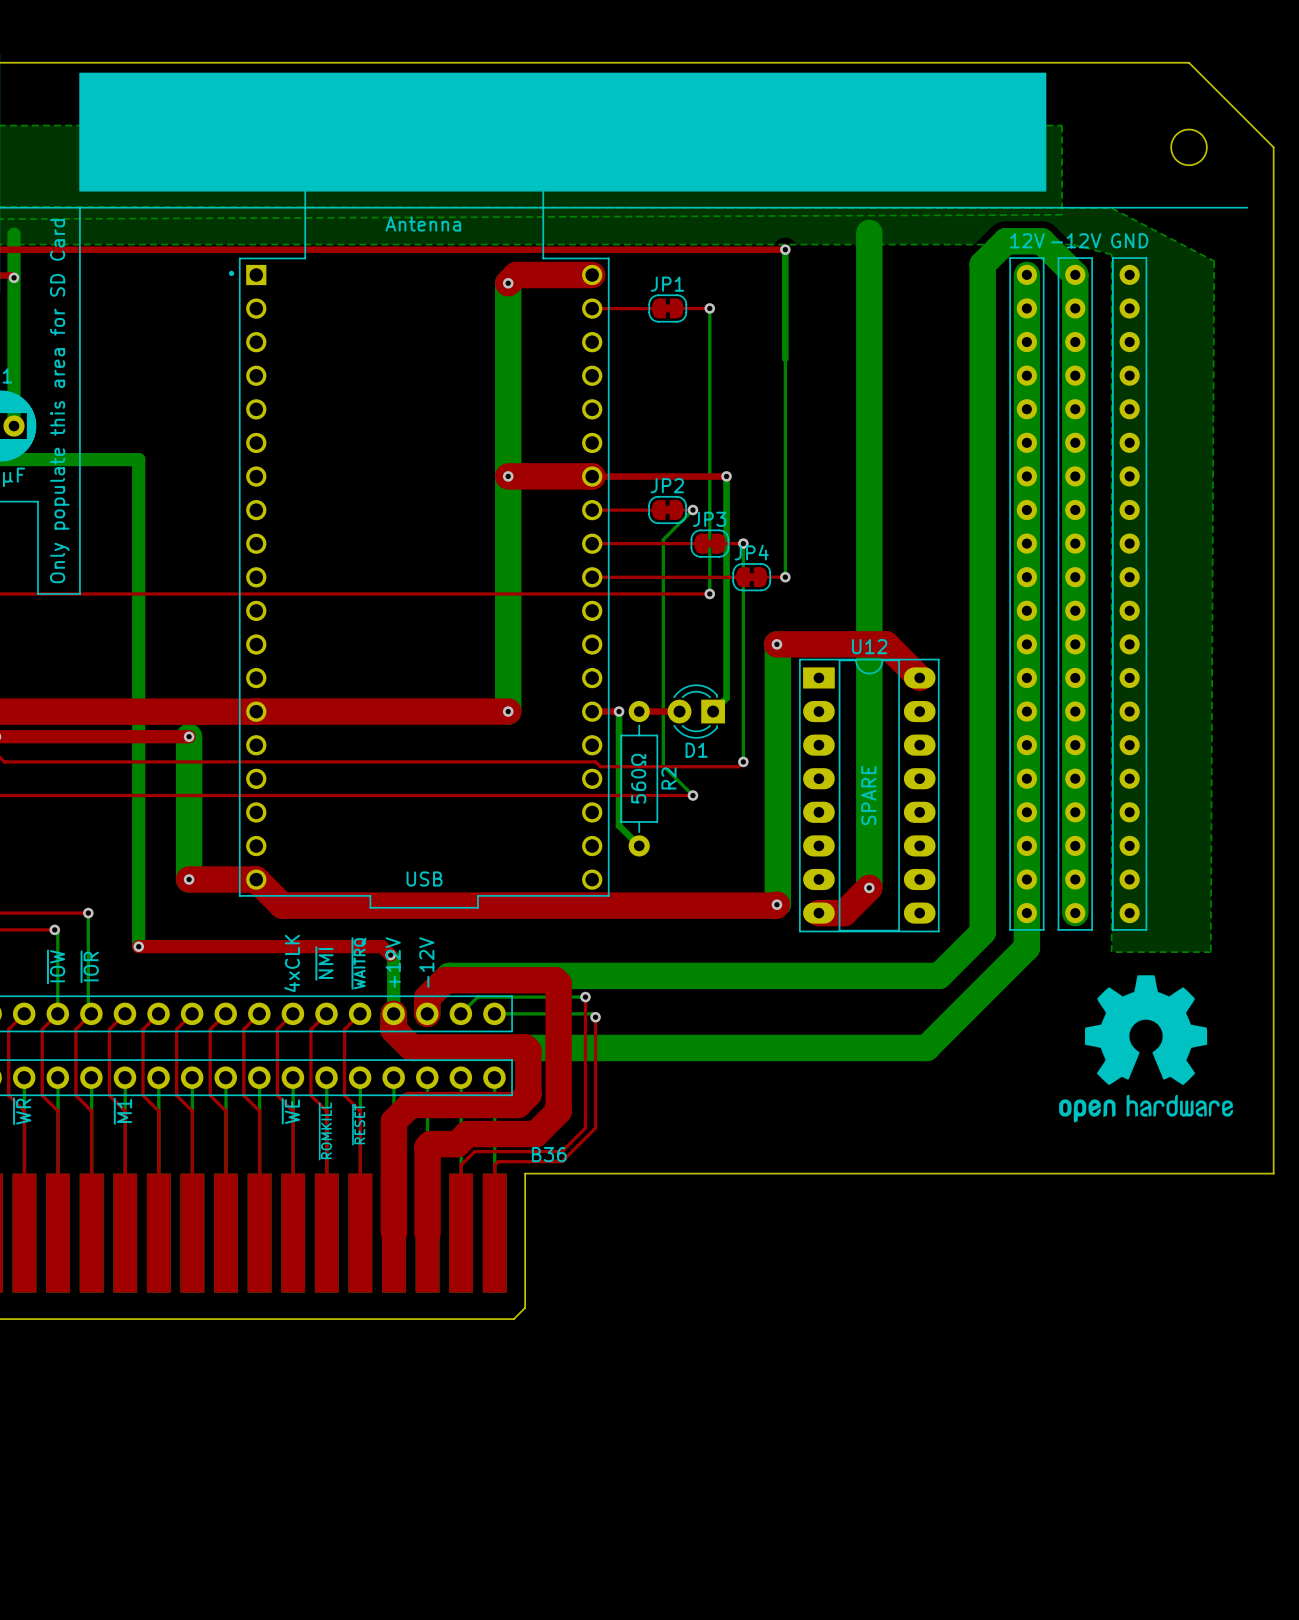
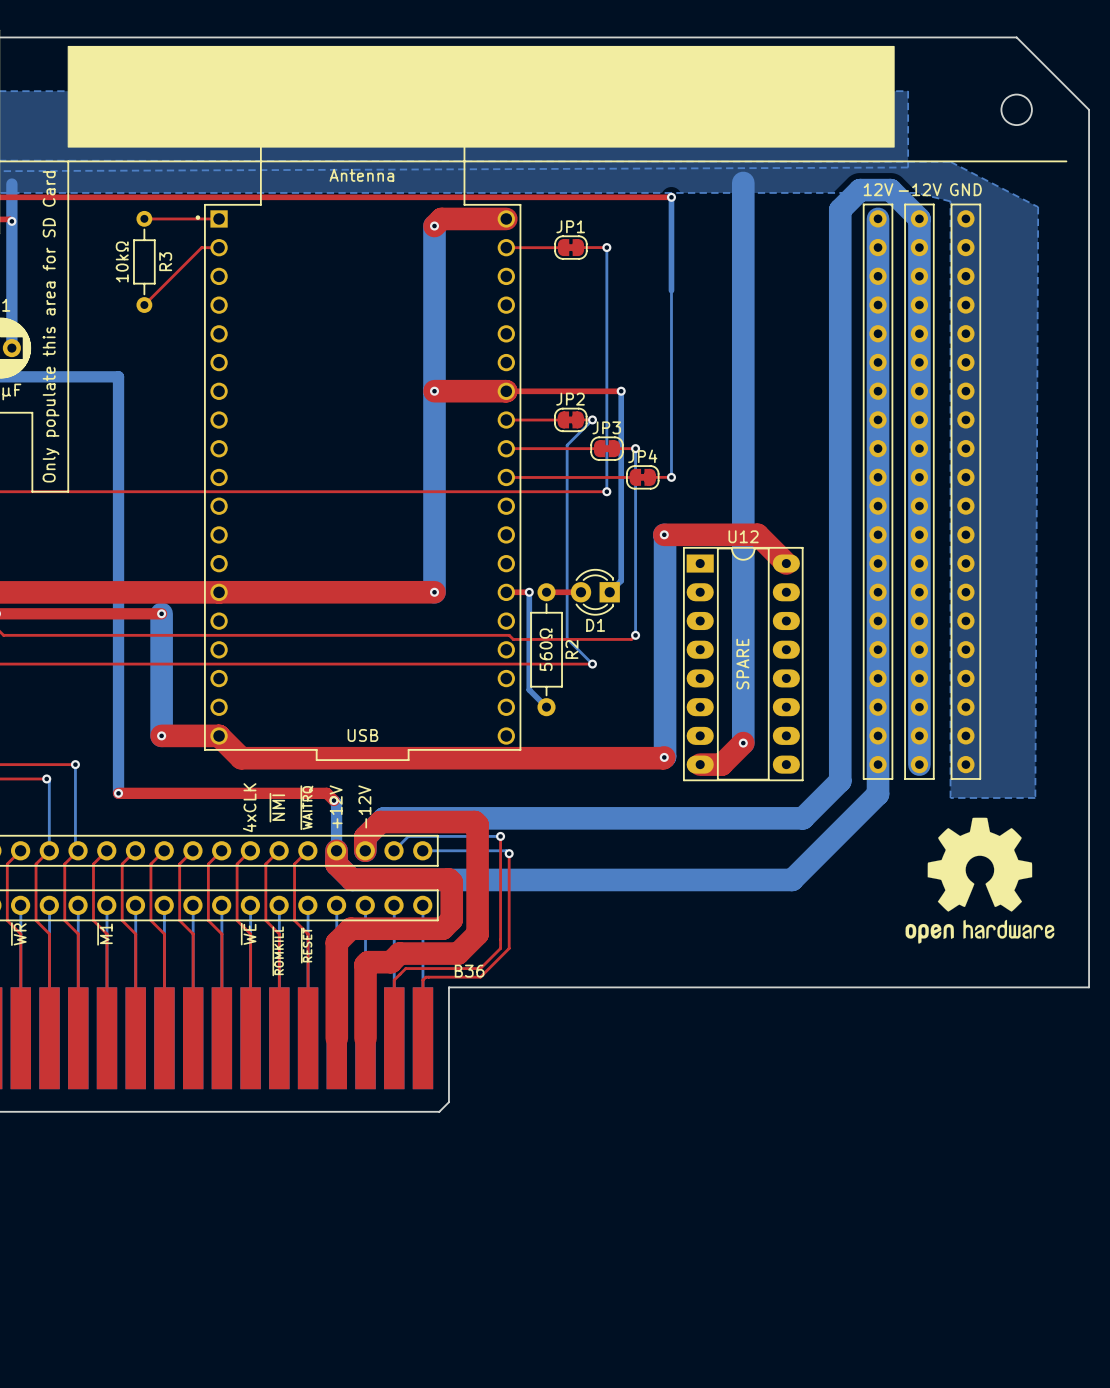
top track: none -> (144, 218) (219, 218)
top track: none -> (219, 247) (201, 247) (144, 305)
R3: none -> 10kΩ (144, 261)
text: ~{IOW} (56, 966) -> none
text: ~{IOR} (89, 966) -> none

